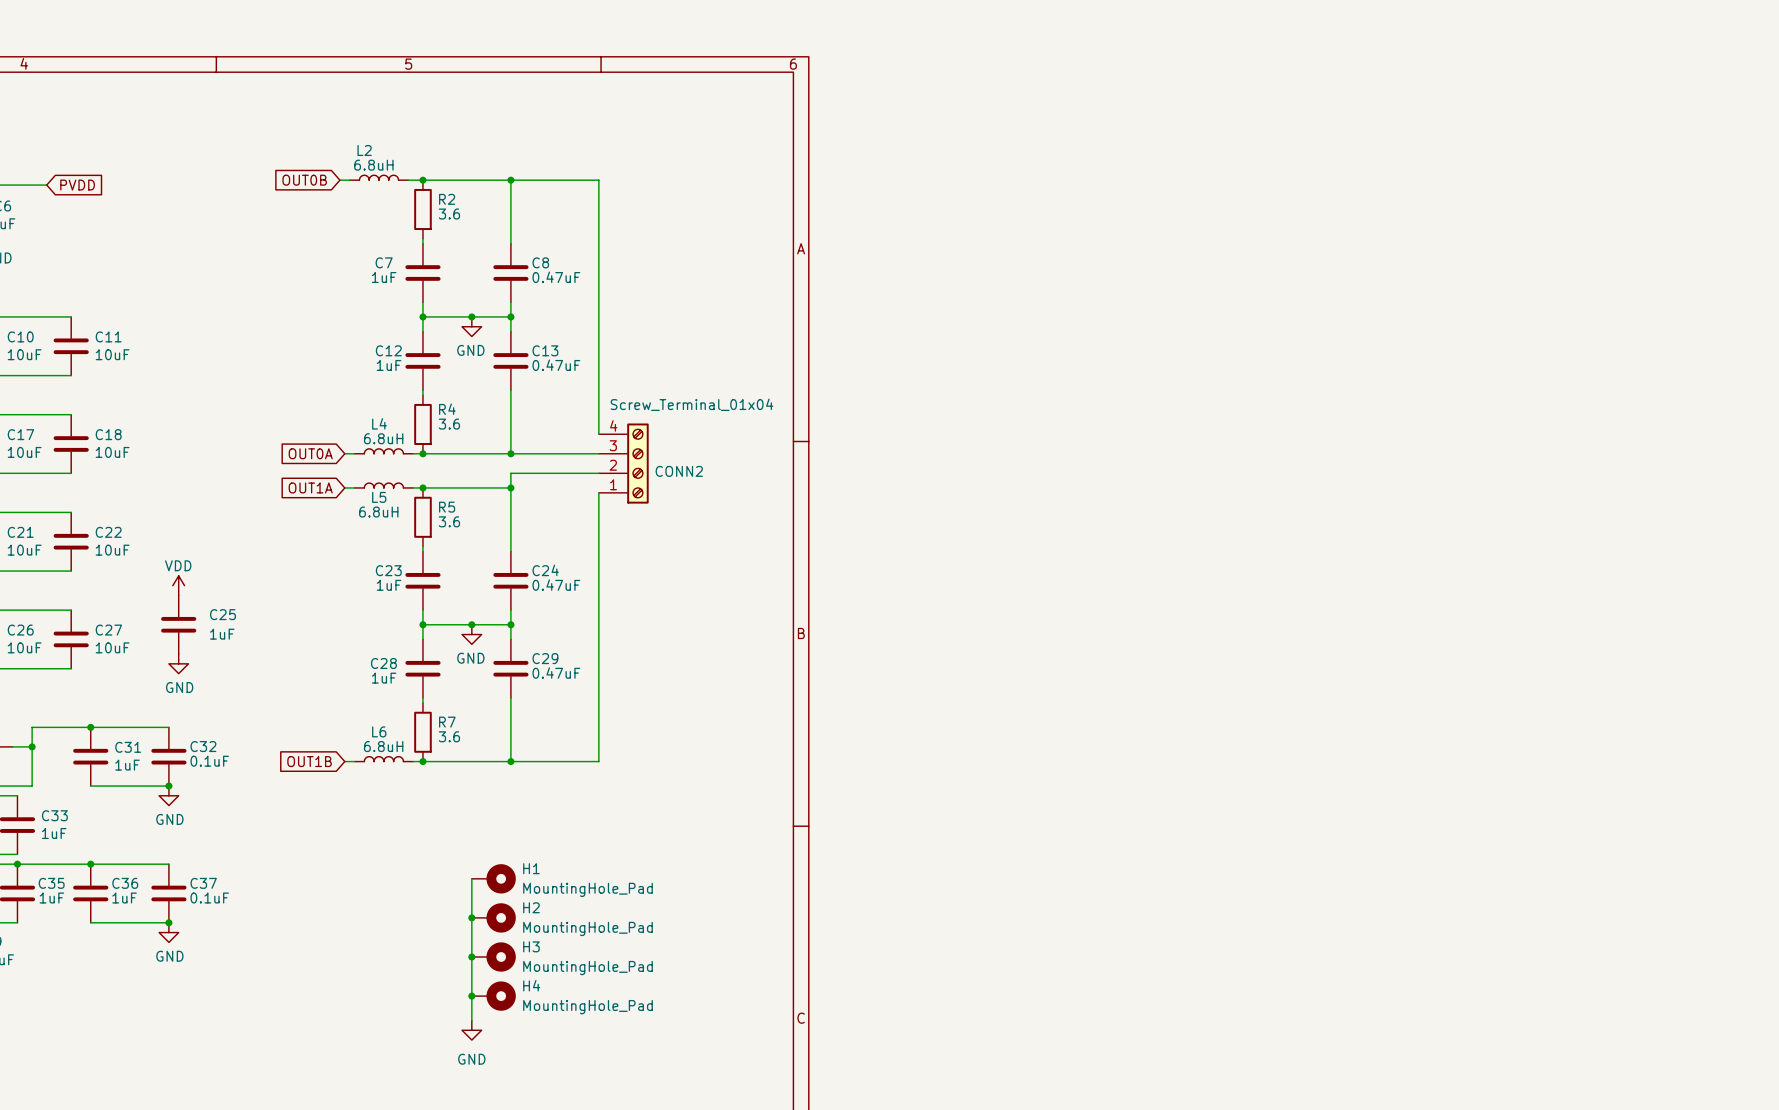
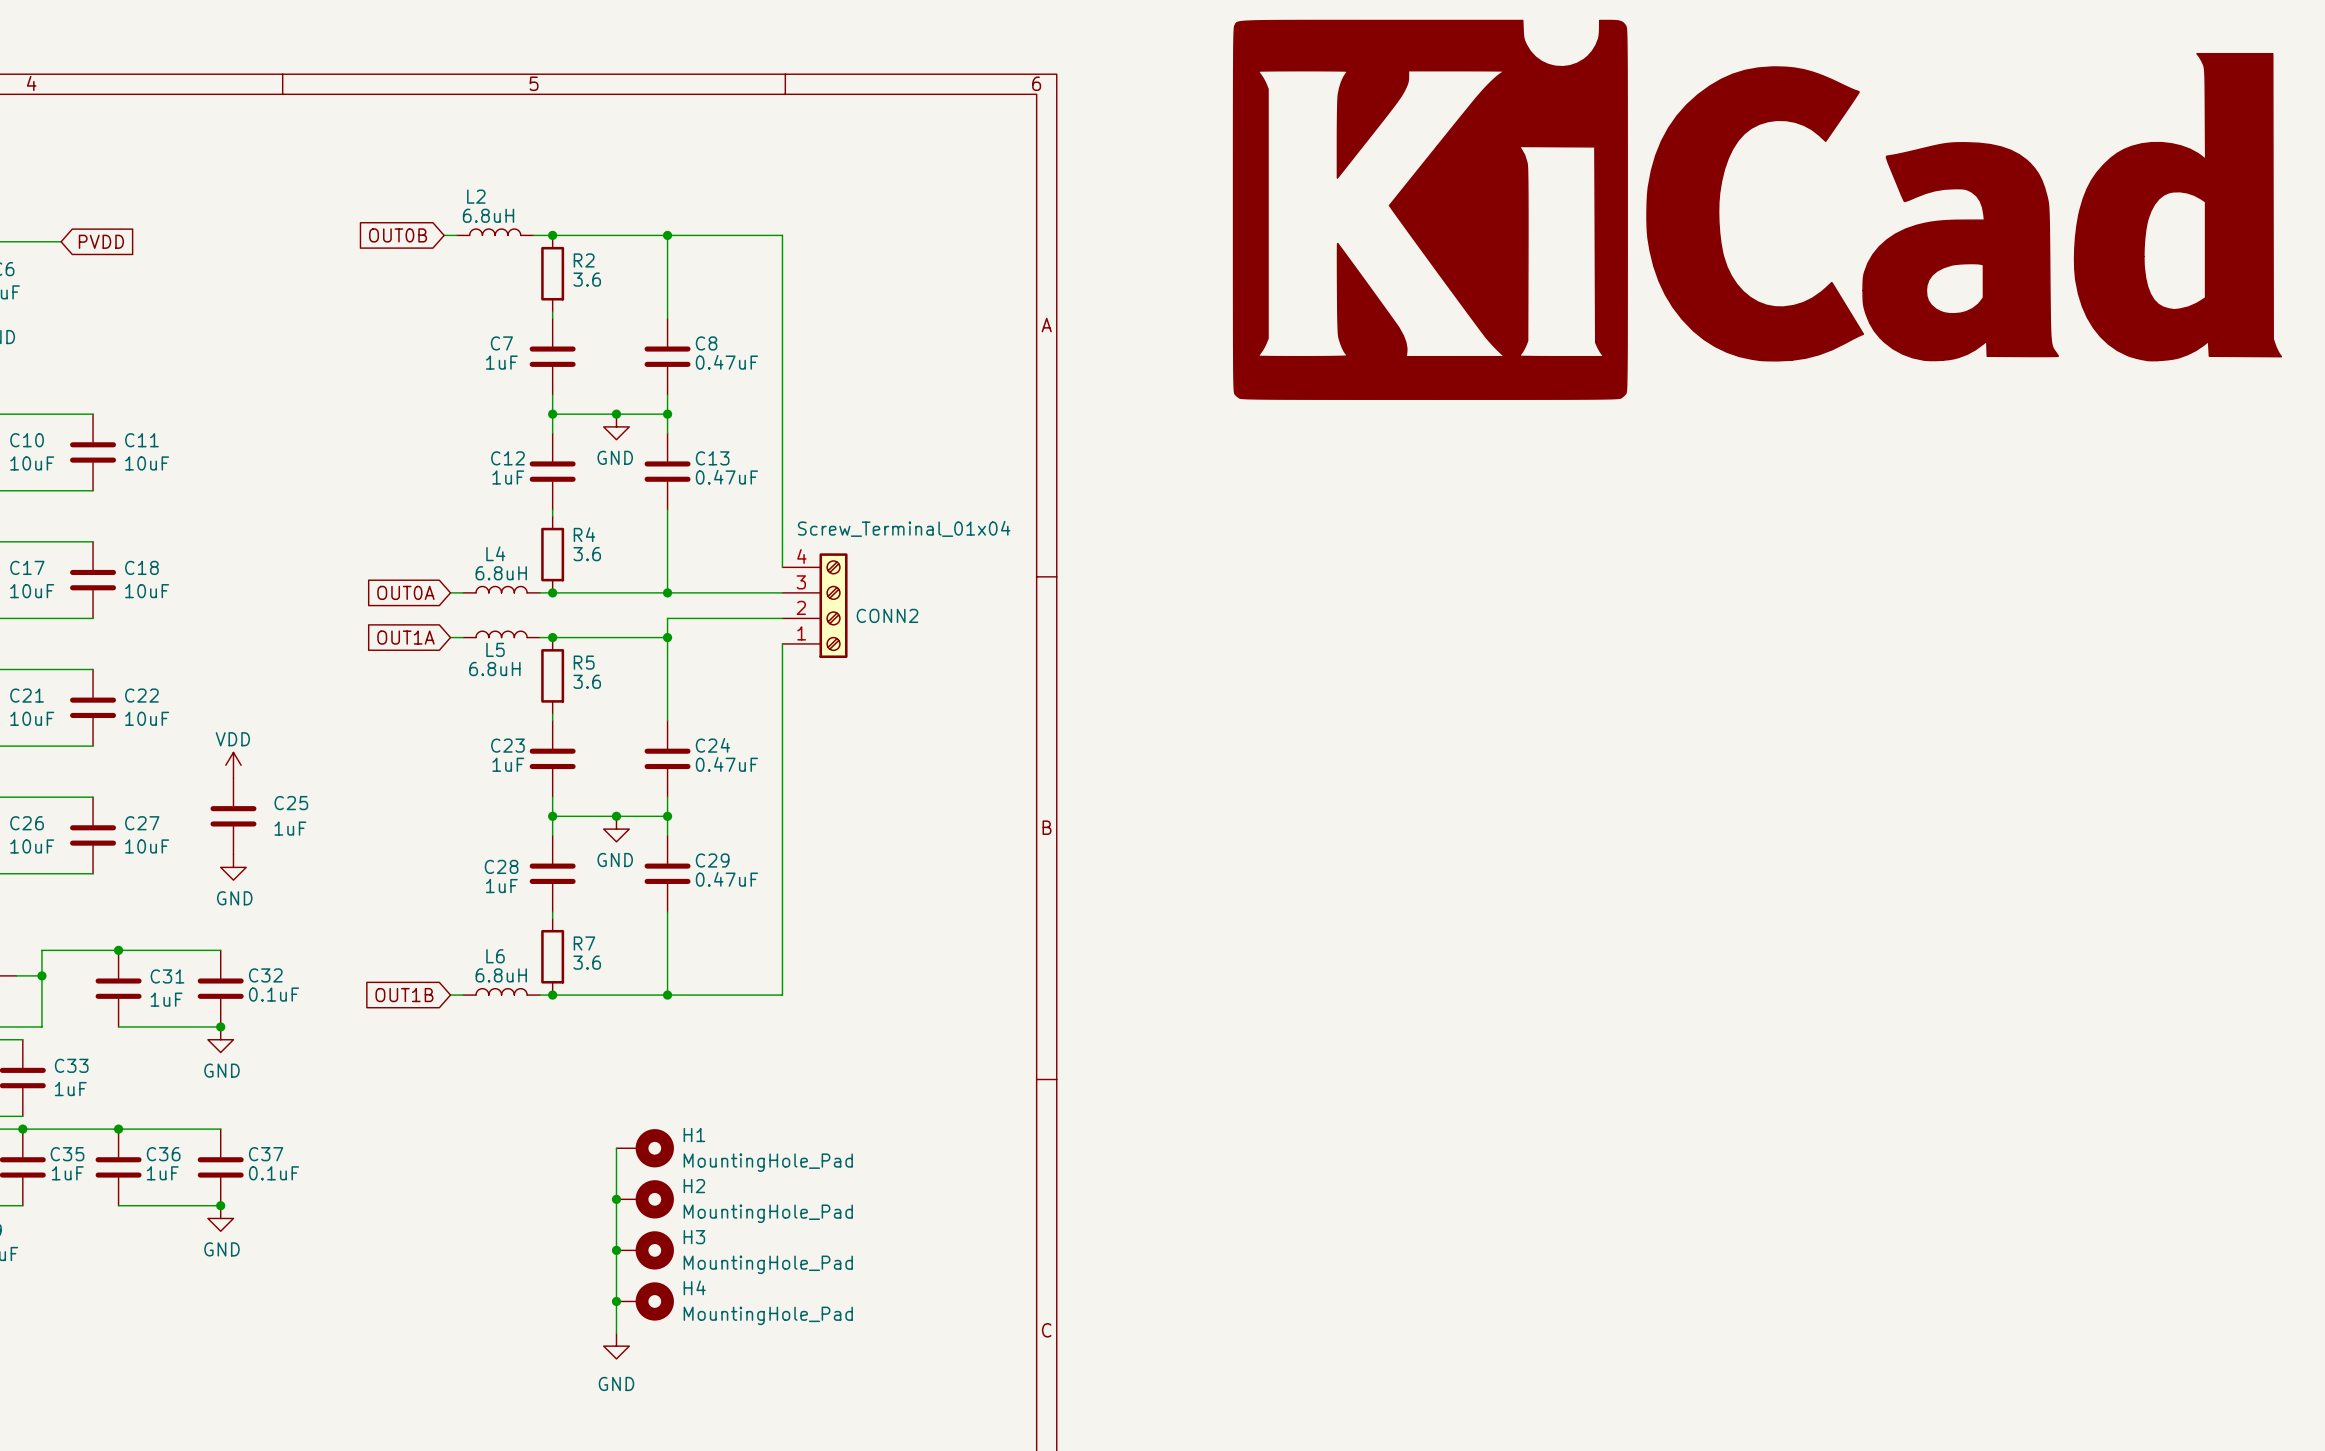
power symbol: none -> (1757, 209)

